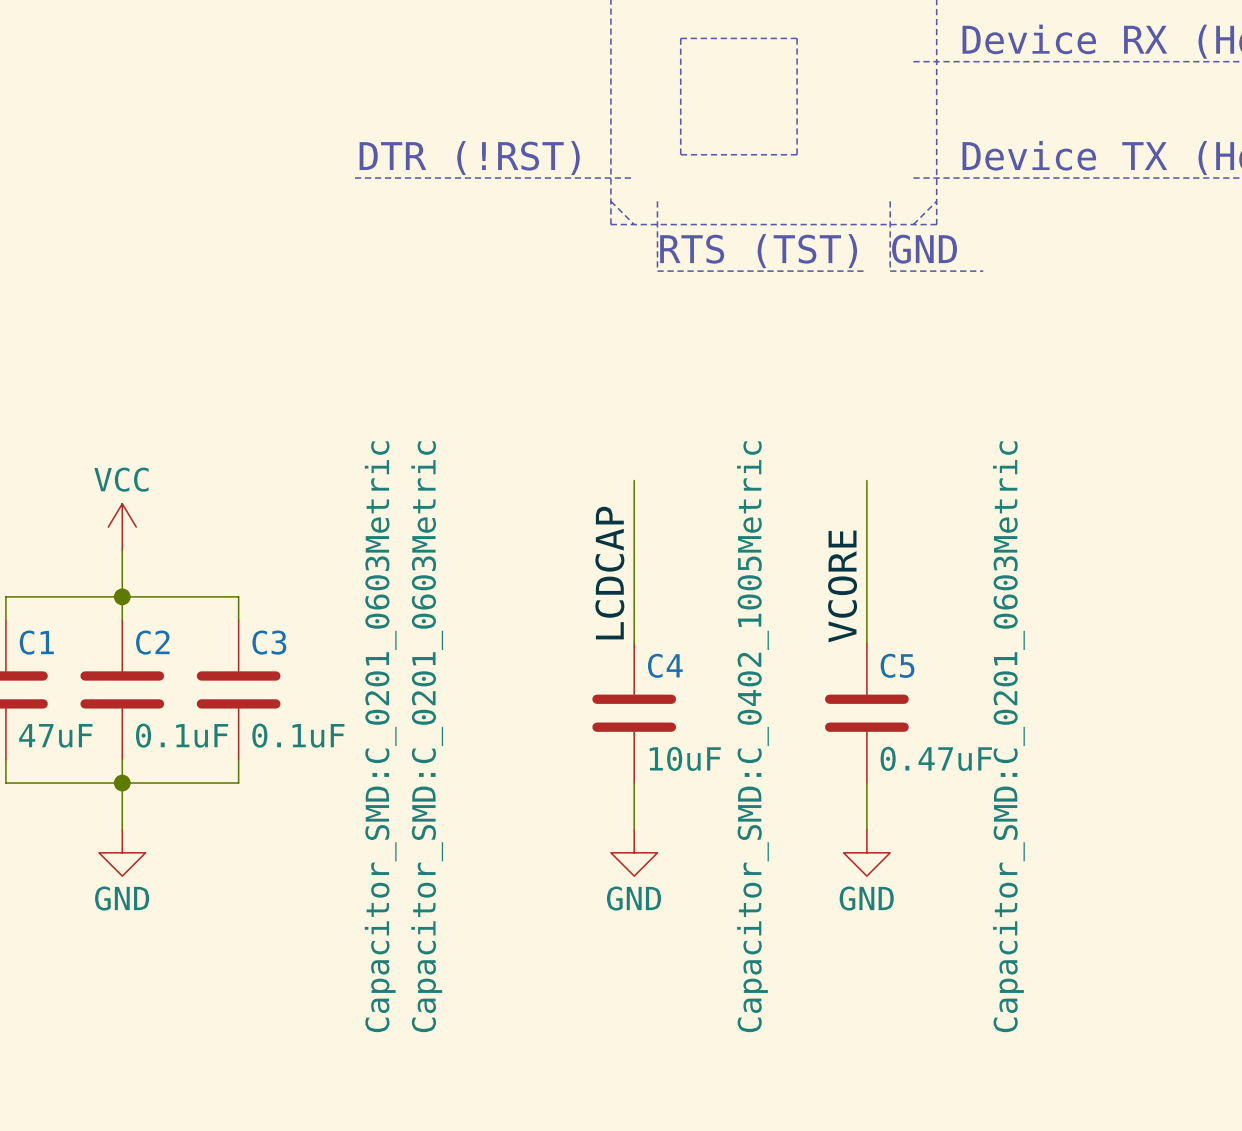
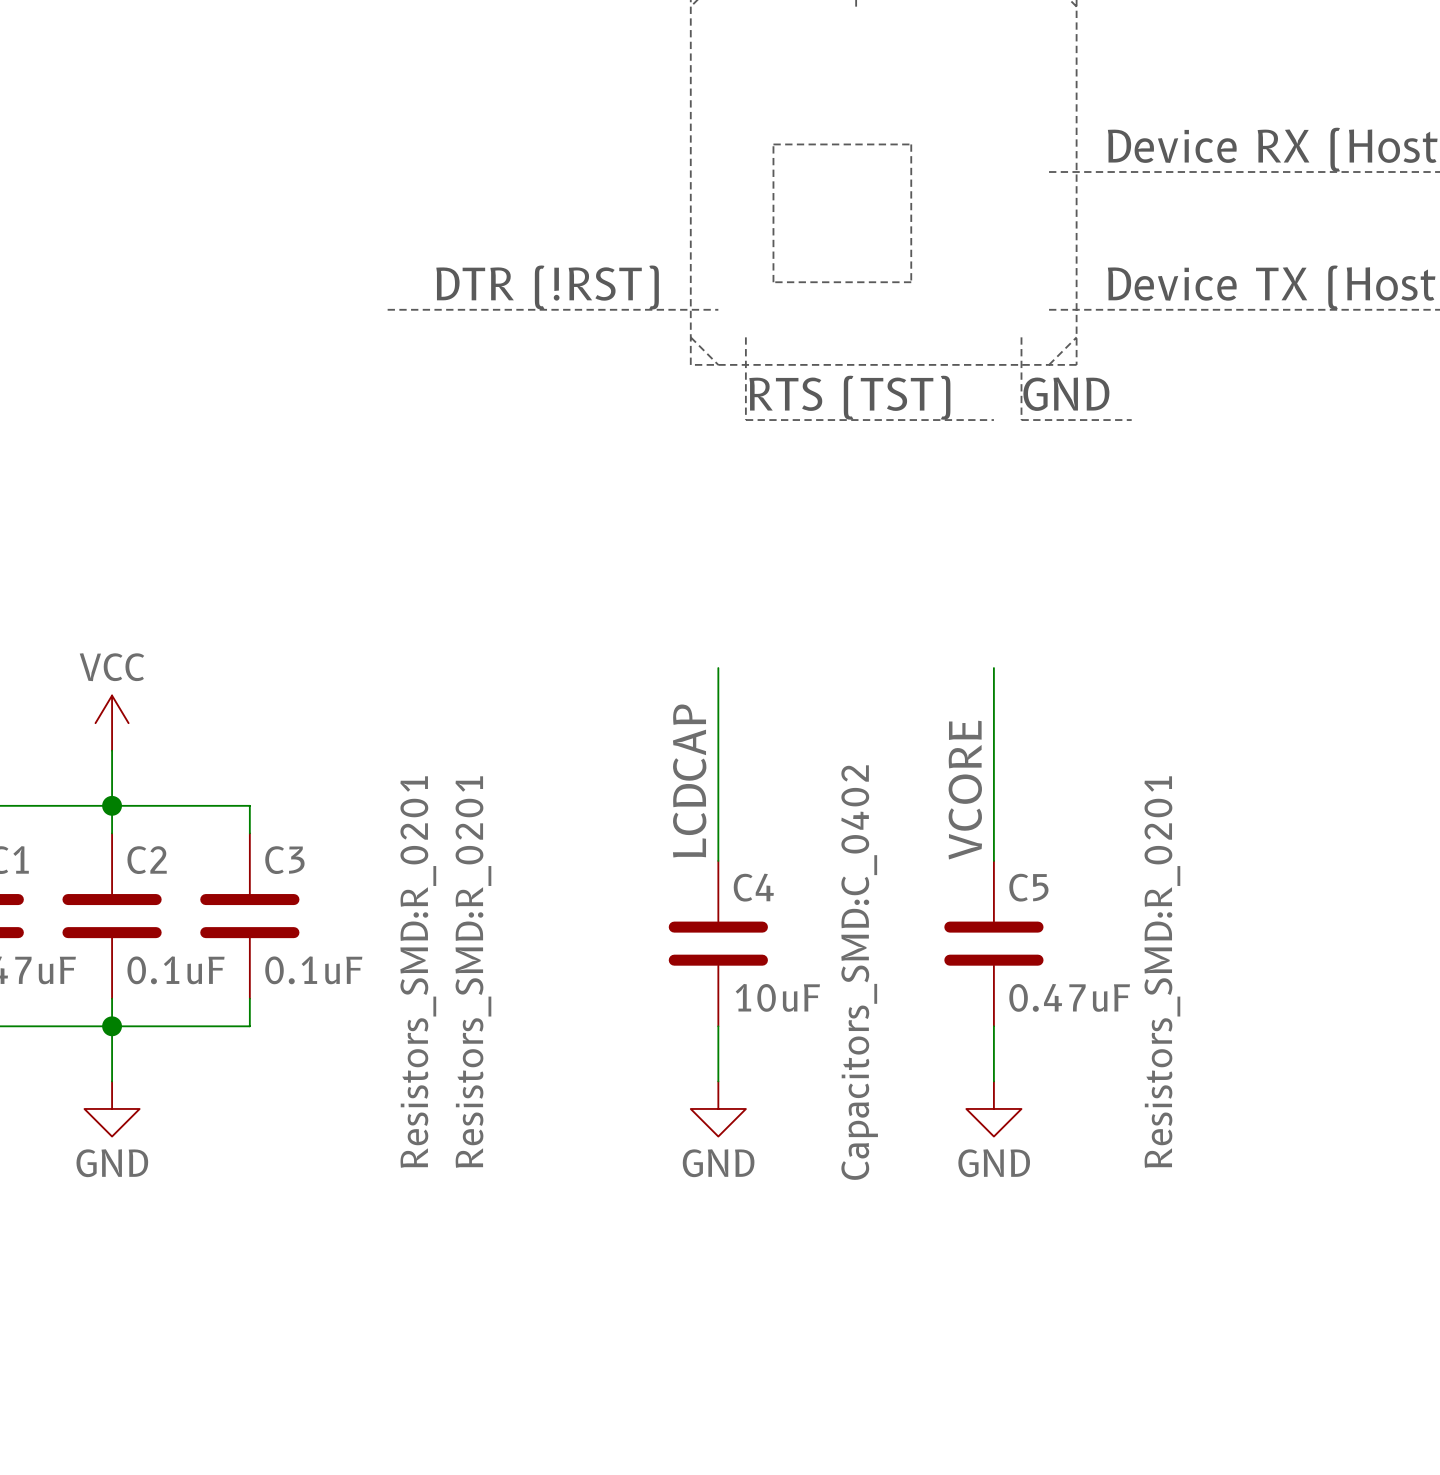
C2 text: Capacitor_SMD:C_0201_0603Metric (380, 736) -> Resistors_SMD:R_0201 (418, 972)
C3 text: Capacitor_SMD:C_0201_0603Metric (427, 736) -> Resistors_SMD:R_0201 (473, 972)
C4 text: Capacitor_SMD:C_0402_1005Metric (752, 736) -> Capacitors_SMD:C_0402 (859, 972)
C5 text: Capacitor_SMD:C_0201_0603Metric (1008, 736) -> Resistors_SMD:R_0201 (1162, 972)

